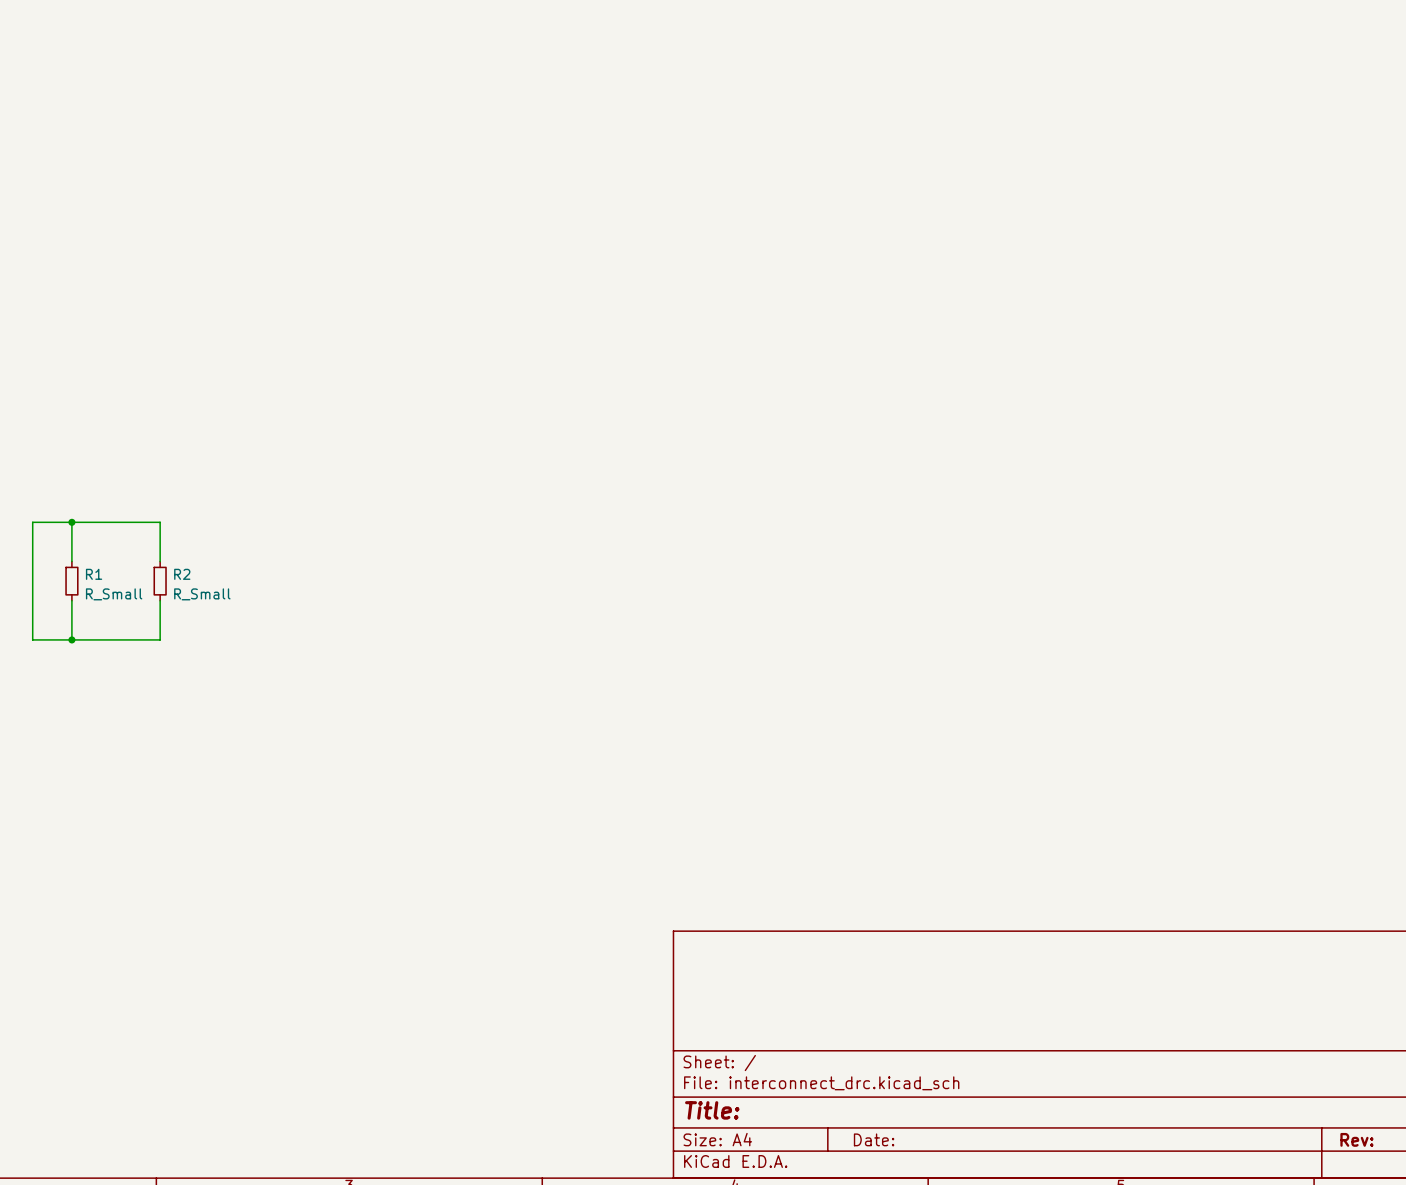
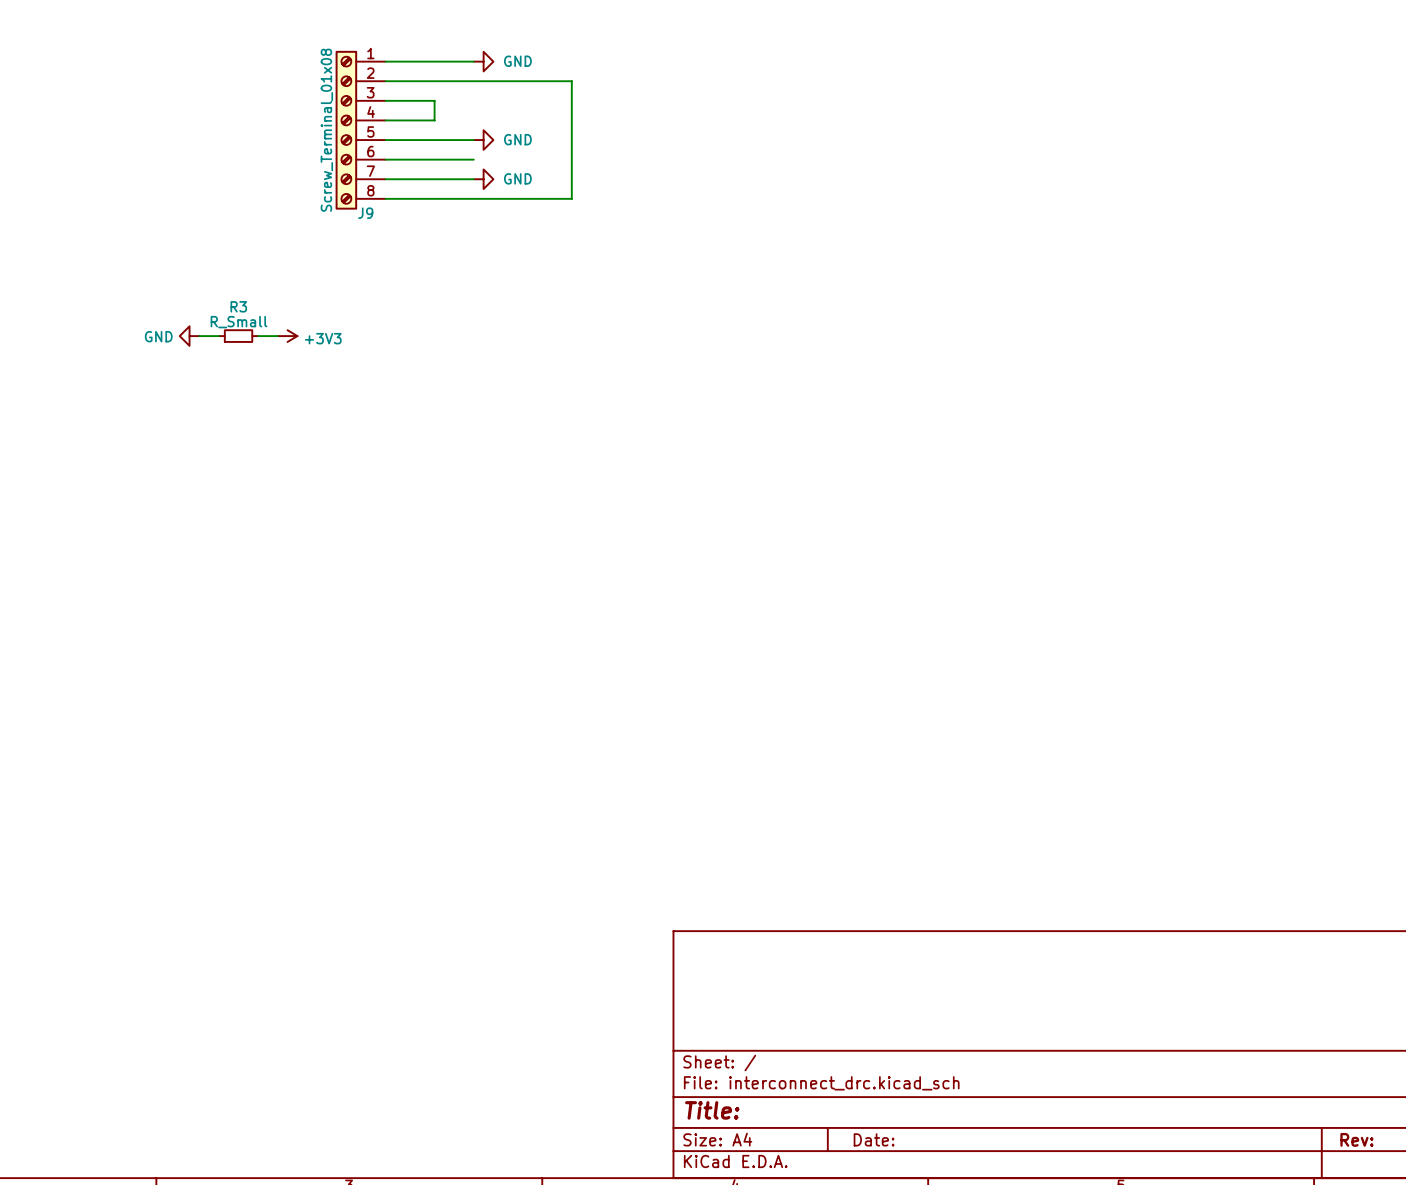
wire: none -> (385, 61) (473, 61)
power symbol: none -> GND (483, 61)
wire: none -> (385, 81) (571, 81) (571, 198) (385, 198)
wire: none -> (385, 100) (434, 100) (434, 120) (385, 120)
J9: none -> Screw_Terminal_01x08 (360, 130)
wire: none -> (385, 140) (473, 140)
power symbol: none -> GND (483, 140)
wire: none -> (385, 159) (473, 159)
wire: none -> (385, 179) (473, 179)
power symbol: none -> GND (483, 179)
power symbol: none -> GND (189, 336)
wire: none -> (199, 336) (218, 336)
R3: none -> R_Small (238, 336)
wire: none -> (258, 336) (277, 336)
power symbol: none -> +3V3 (287, 336)
wire: (71, 522) (71, 561) -> none
junction: (71, 522) -> none
wire: (160, 561) (160, 522) (32, 522) (32, 639) (160, 639) (160, 600) -> none
R1: R_Small (71, 581) -> none
R2: R_Small (160, 581) -> none
wire: (71, 600) (71, 639) -> none
junction: (71, 639) -> none

